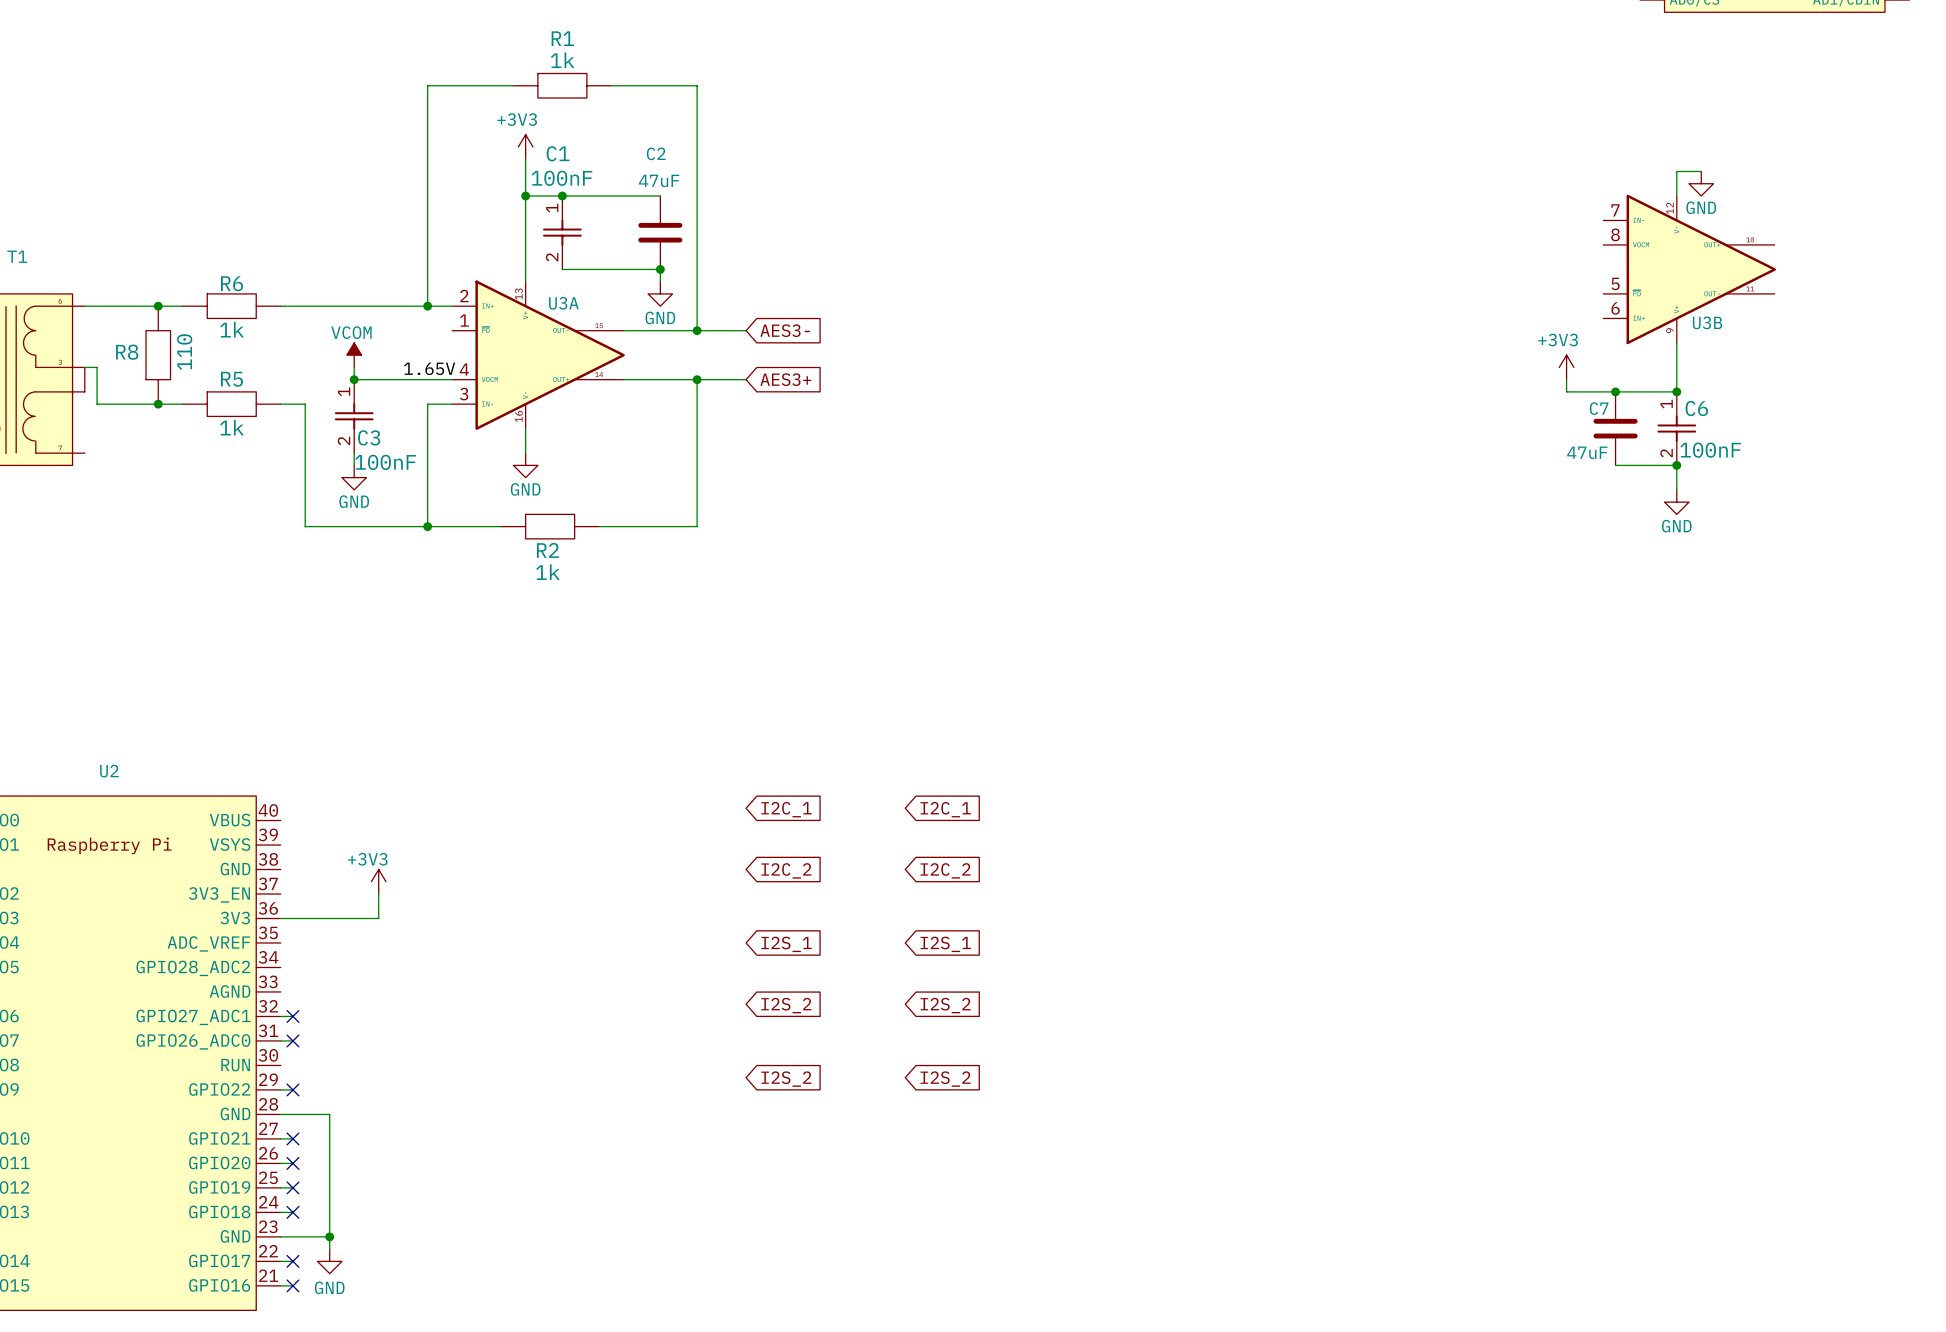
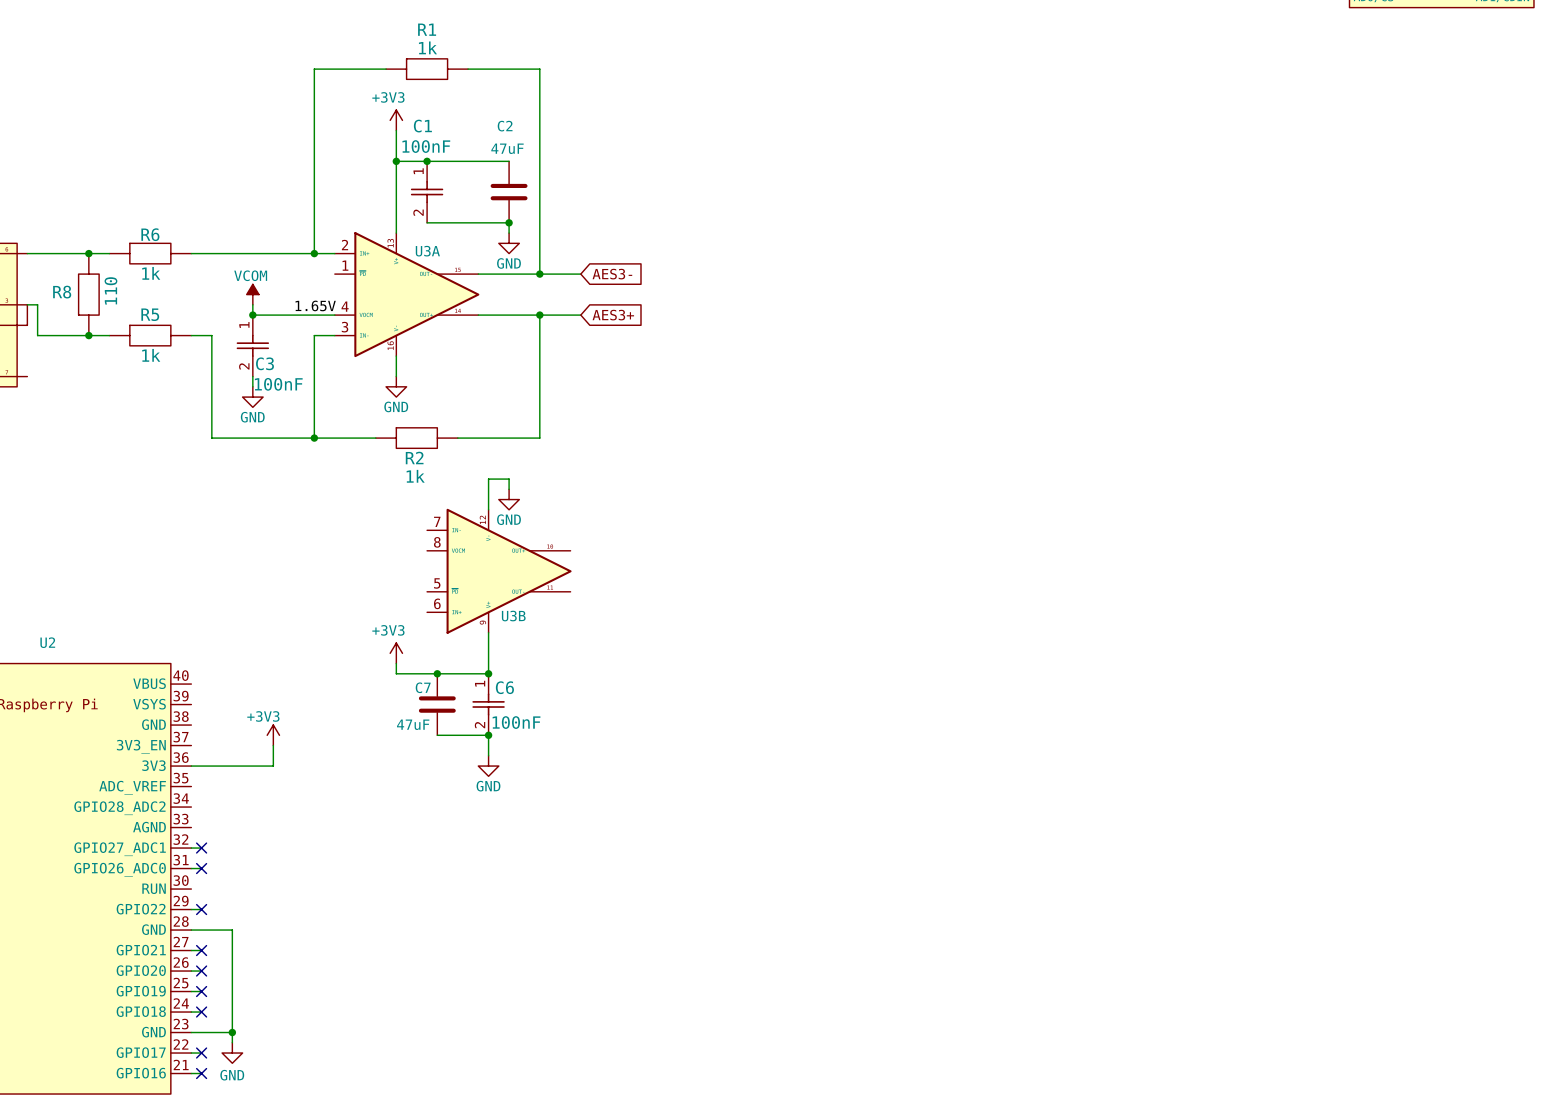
wire: (1701, 171) (1676, 171) (1676, 195) -> none
power symbol: GND (1701, 183) -> none
U3B position: (1689, 269) -> (499, 571)
wire: (1676, 342) (1676, 391) (1566, 391) (1566, 379) -> none
power symbol: +3V3 (1566, 367) -> none
junction: (1615, 391) -> none
junction: (1676, 391) -> none
C7 position: (1615, 428) -> (437, 704)
C6 position: (1676, 428) -> (488, 704)
wire: (1615, 465) (1676, 465) (1676, 489) -> none
junction: (1676, 465) -> none
power symbol: GND (1676, 502) -> none
wire: none -> (509, 489) (509, 479) (488, 479) (488, 509)
power symbol: none -> GND (509, 499)
wire: none -> (488, 632) (488, 673) (396, 673) (396, 663)
power symbol: none -> +3V3 (396, 653)
junction: none -> (437, 673)
junction: none -> (488, 673)
global label: I2C_1 (786, 809) -> none
global label: I2C_1 (945, 809) -> none
global label: I2C_2 (786, 870) -> none
global label: I2C_2 (945, 870) -> none
wire: none -> (437, 735) (488, 735) (488, 755)
junction: none -> (488, 735)
power symbol: none -> GND (488, 766)
global label: I2S_1 (786, 944) -> none
global label: I2S_1 (945, 944) -> none
global label: I2S_2 (786, 1005) -> none
global label: I2S_2 (945, 1005) -> none
global label: I2S_2 (786, 1079) -> none
global label: I2S_2 (945, 1079) -> none

